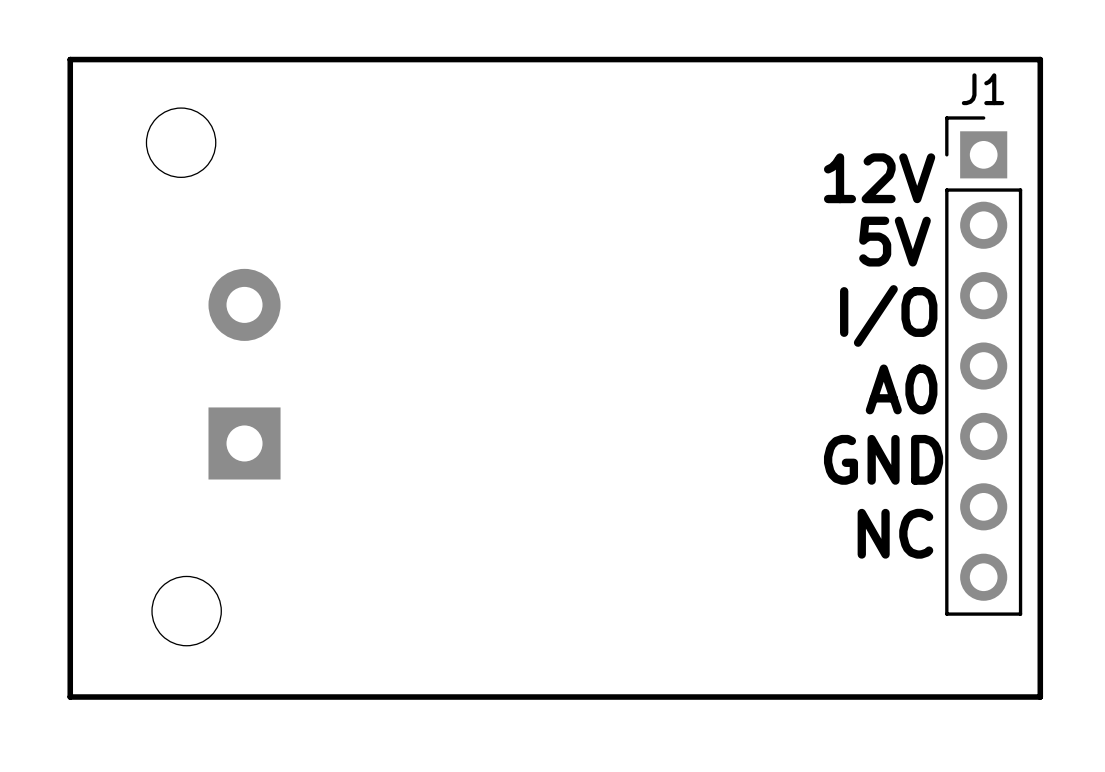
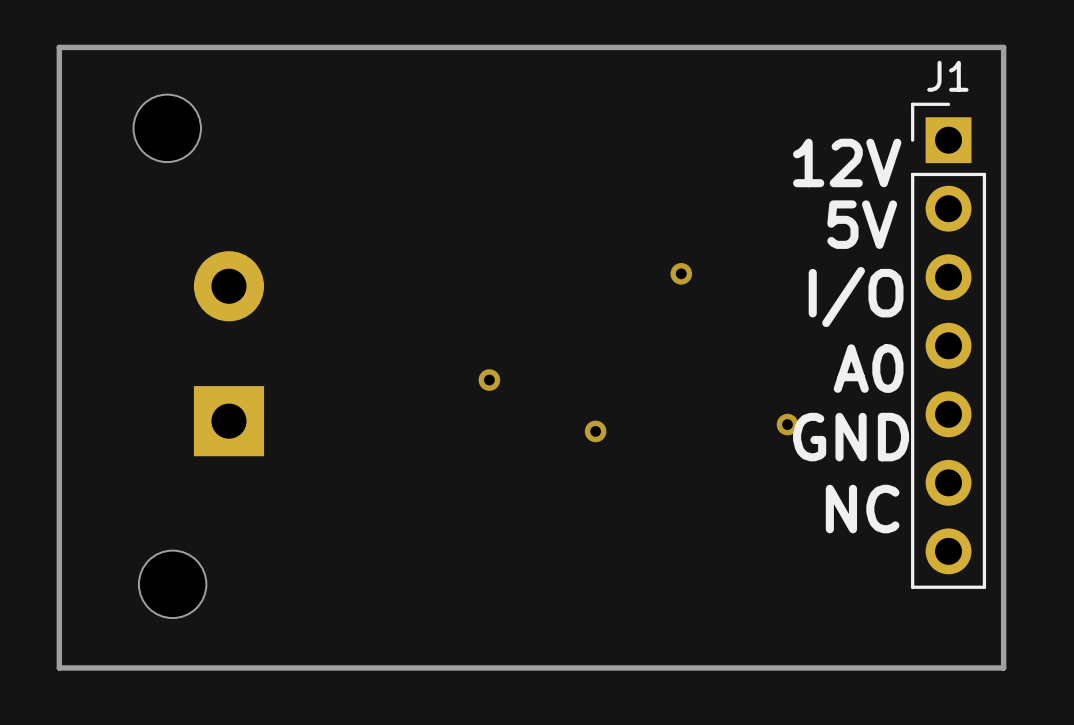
via: none -> (681, 273)
via: none -> (489, 380)
via: none -> (787, 424)
via: none -> (595, 431)

